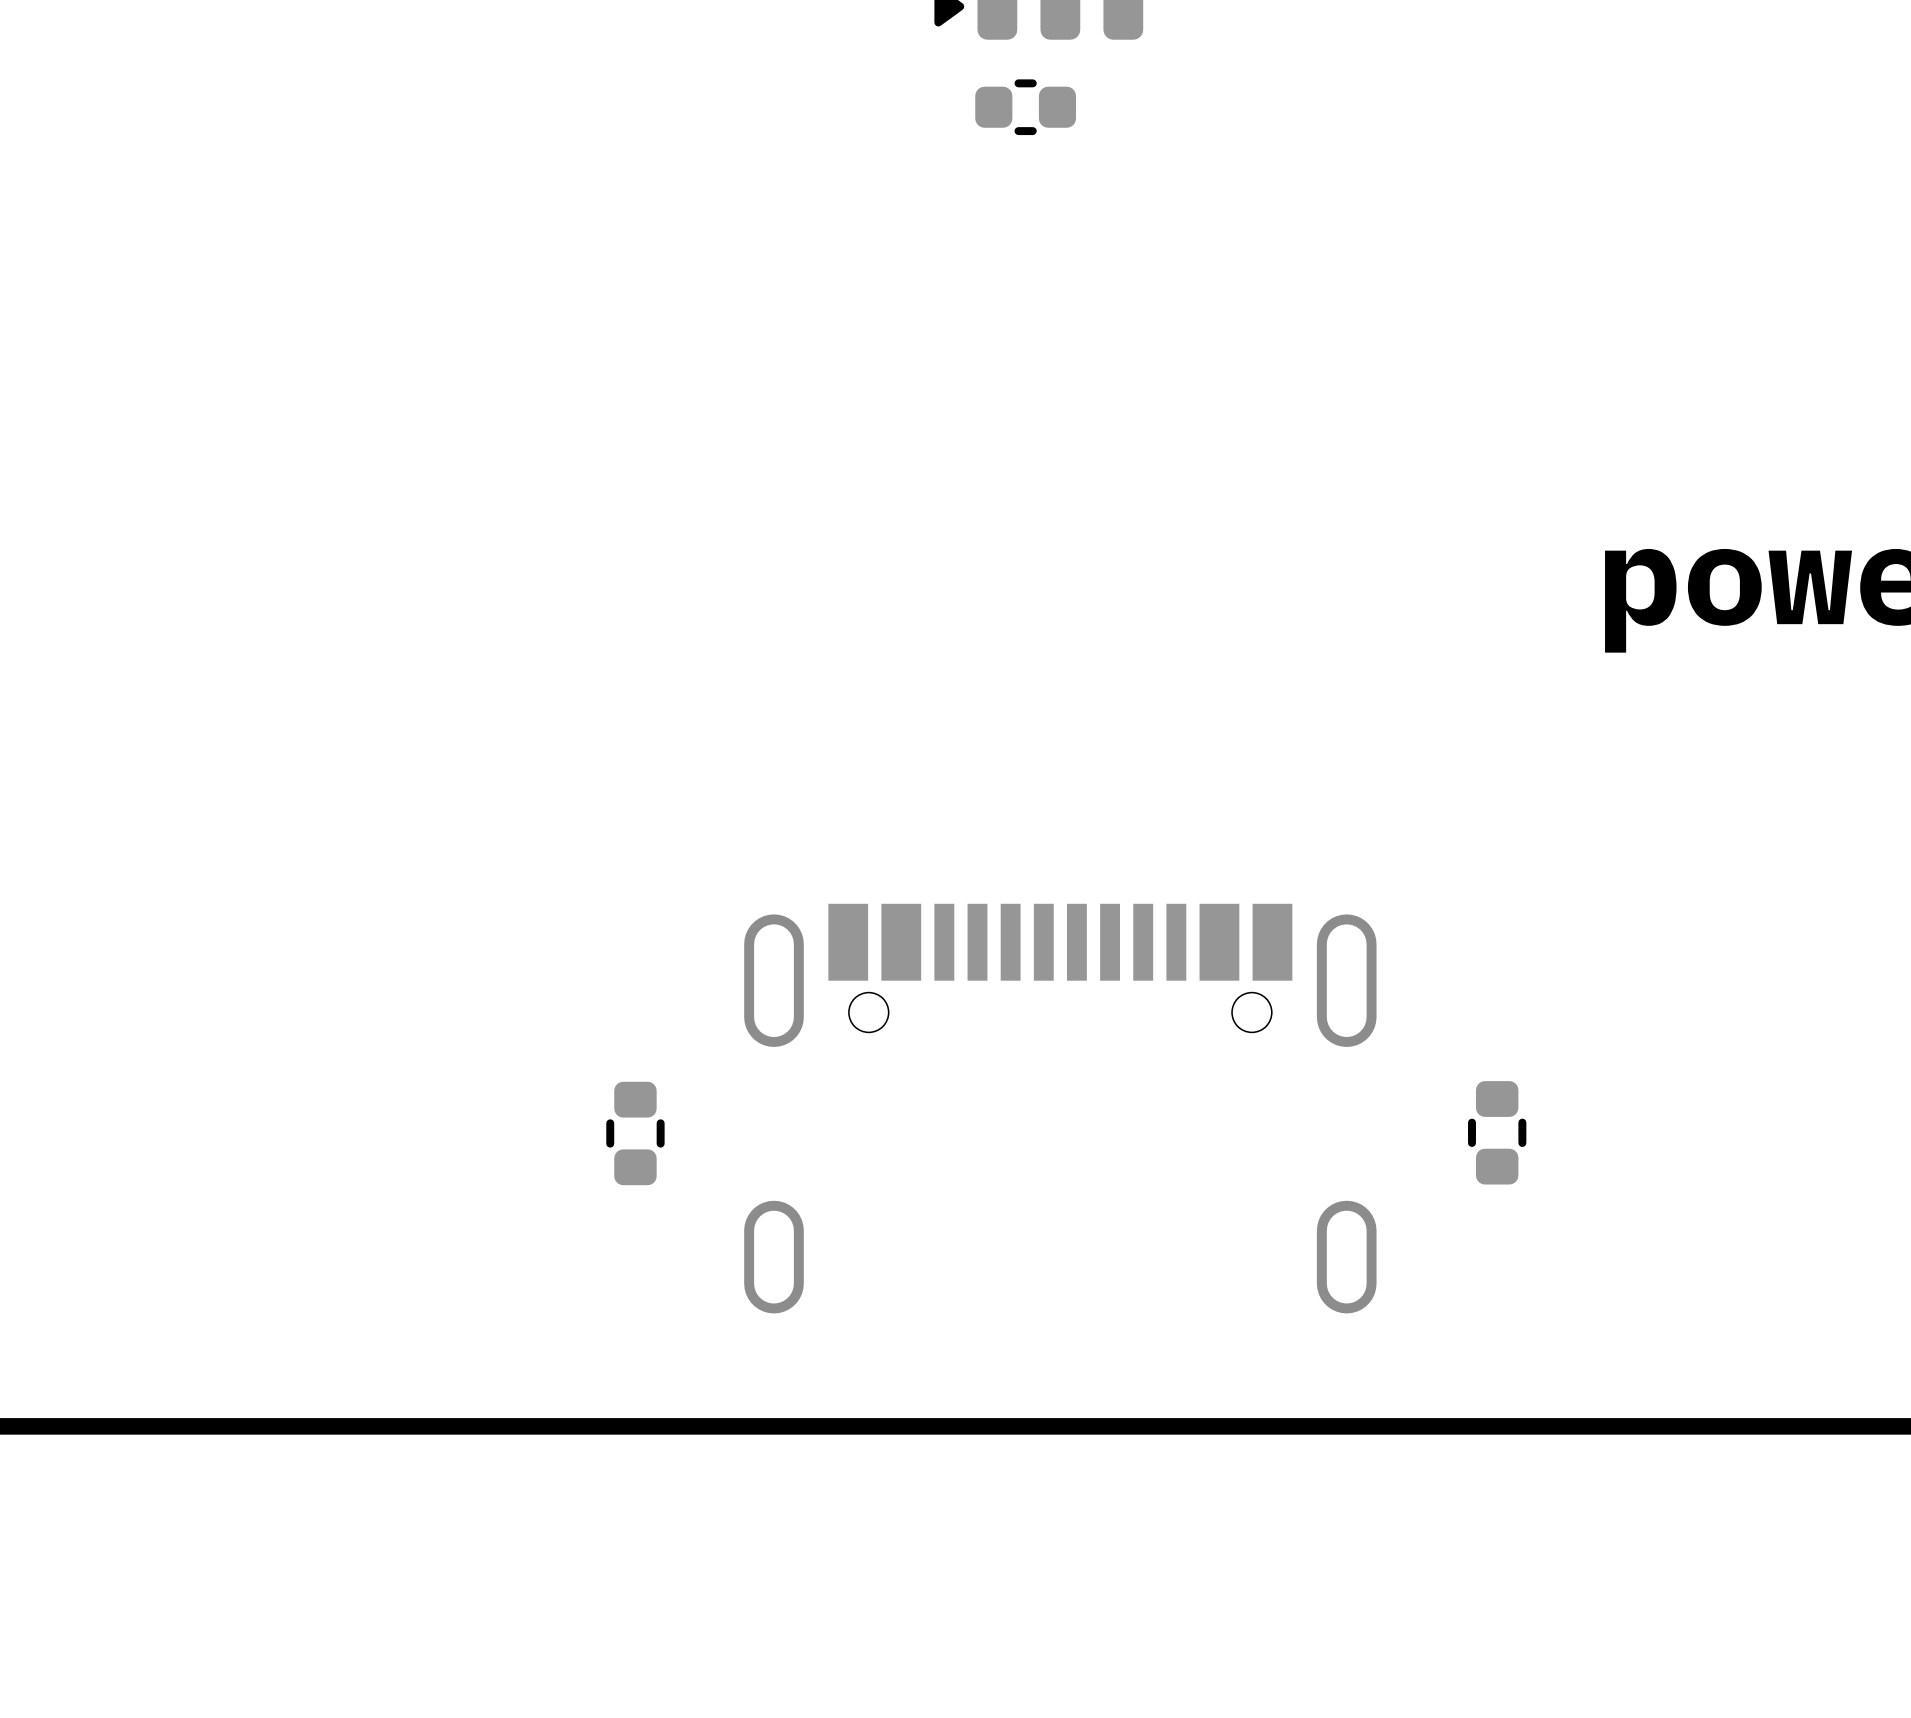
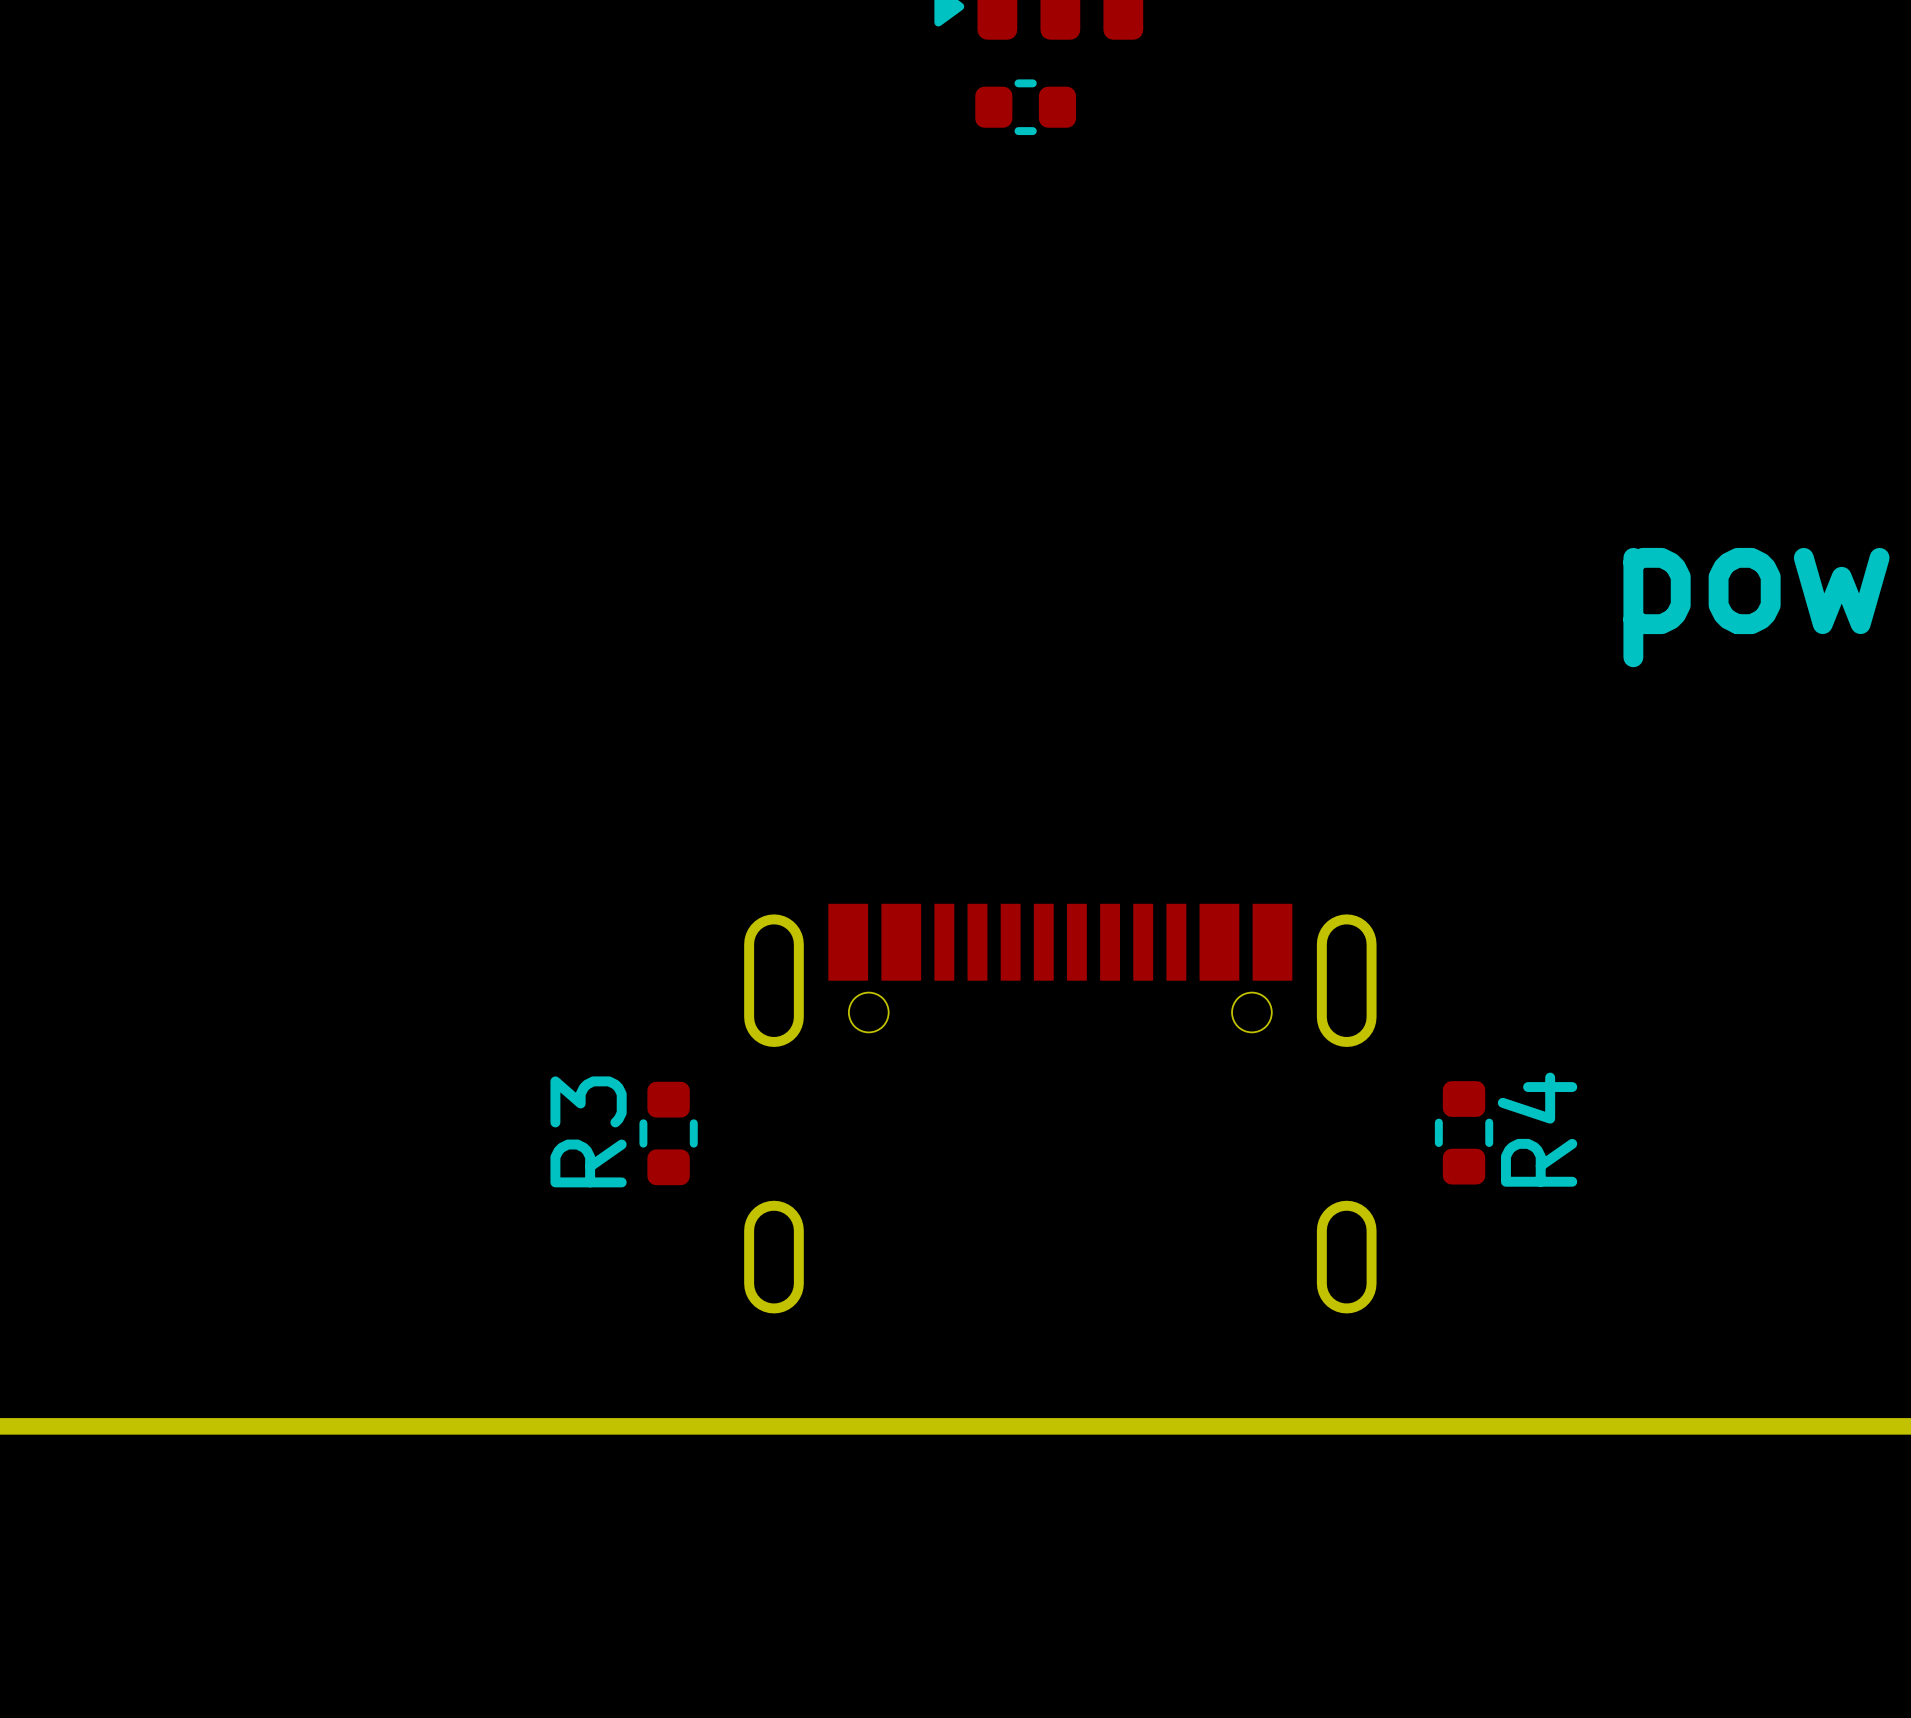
R4 name: none -> R4 (1537, 1129)
R4 position: (1497, 1132) -> (1464, 1132)
R3 name: none -> R3 (588, 1131)
R3 position: (635, 1133) -> (668, 1133)

